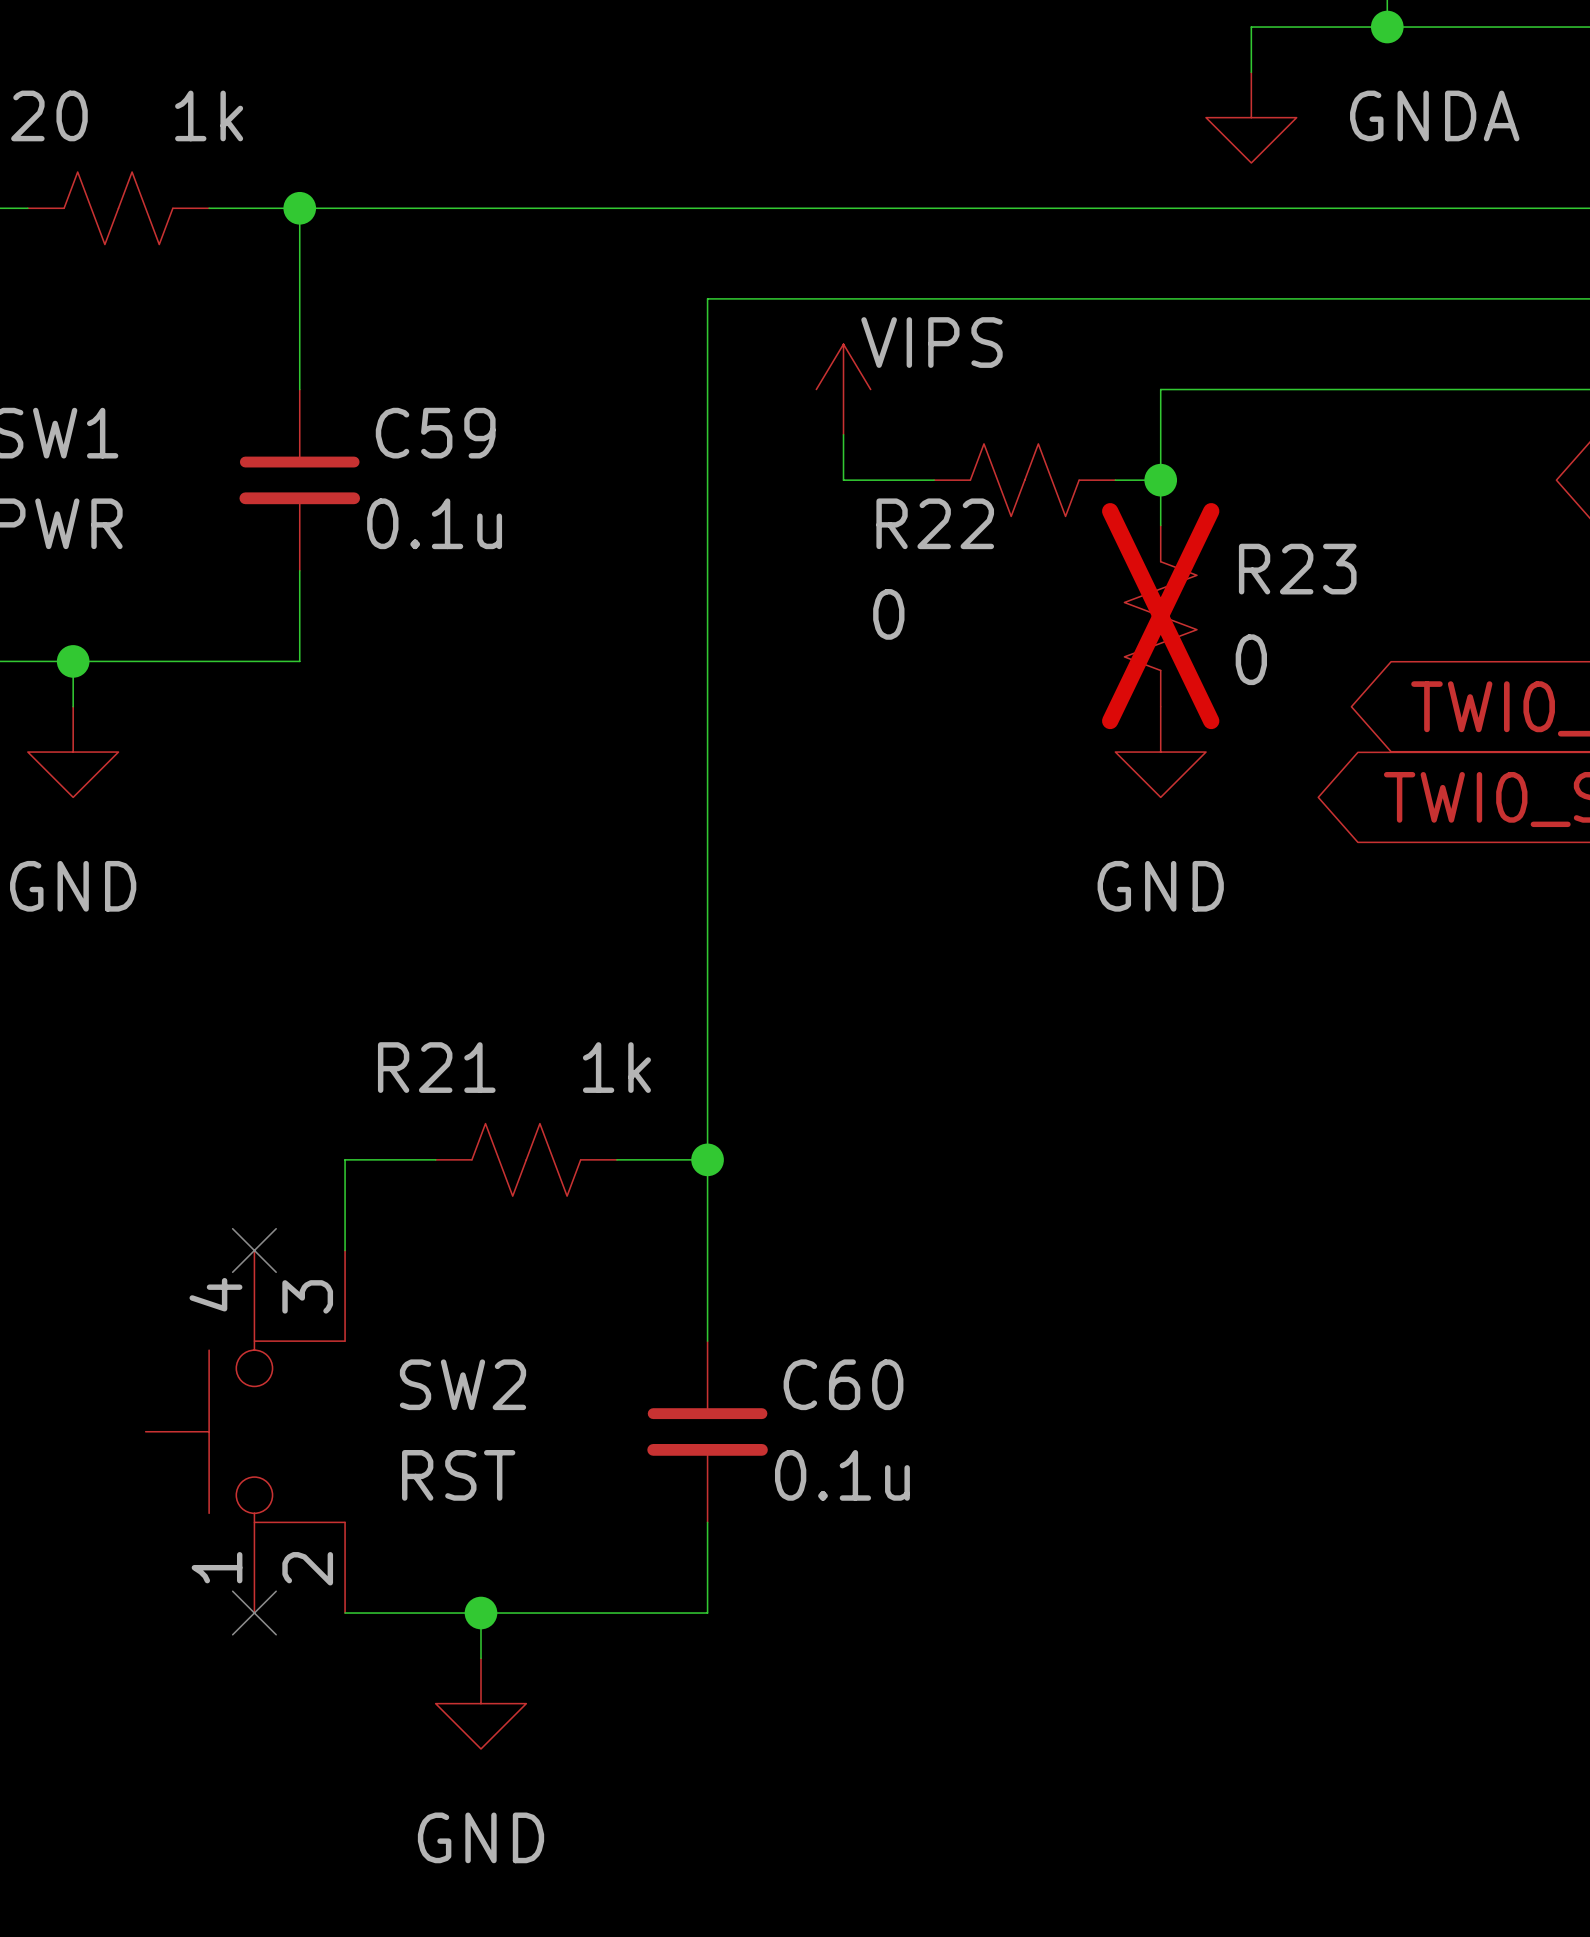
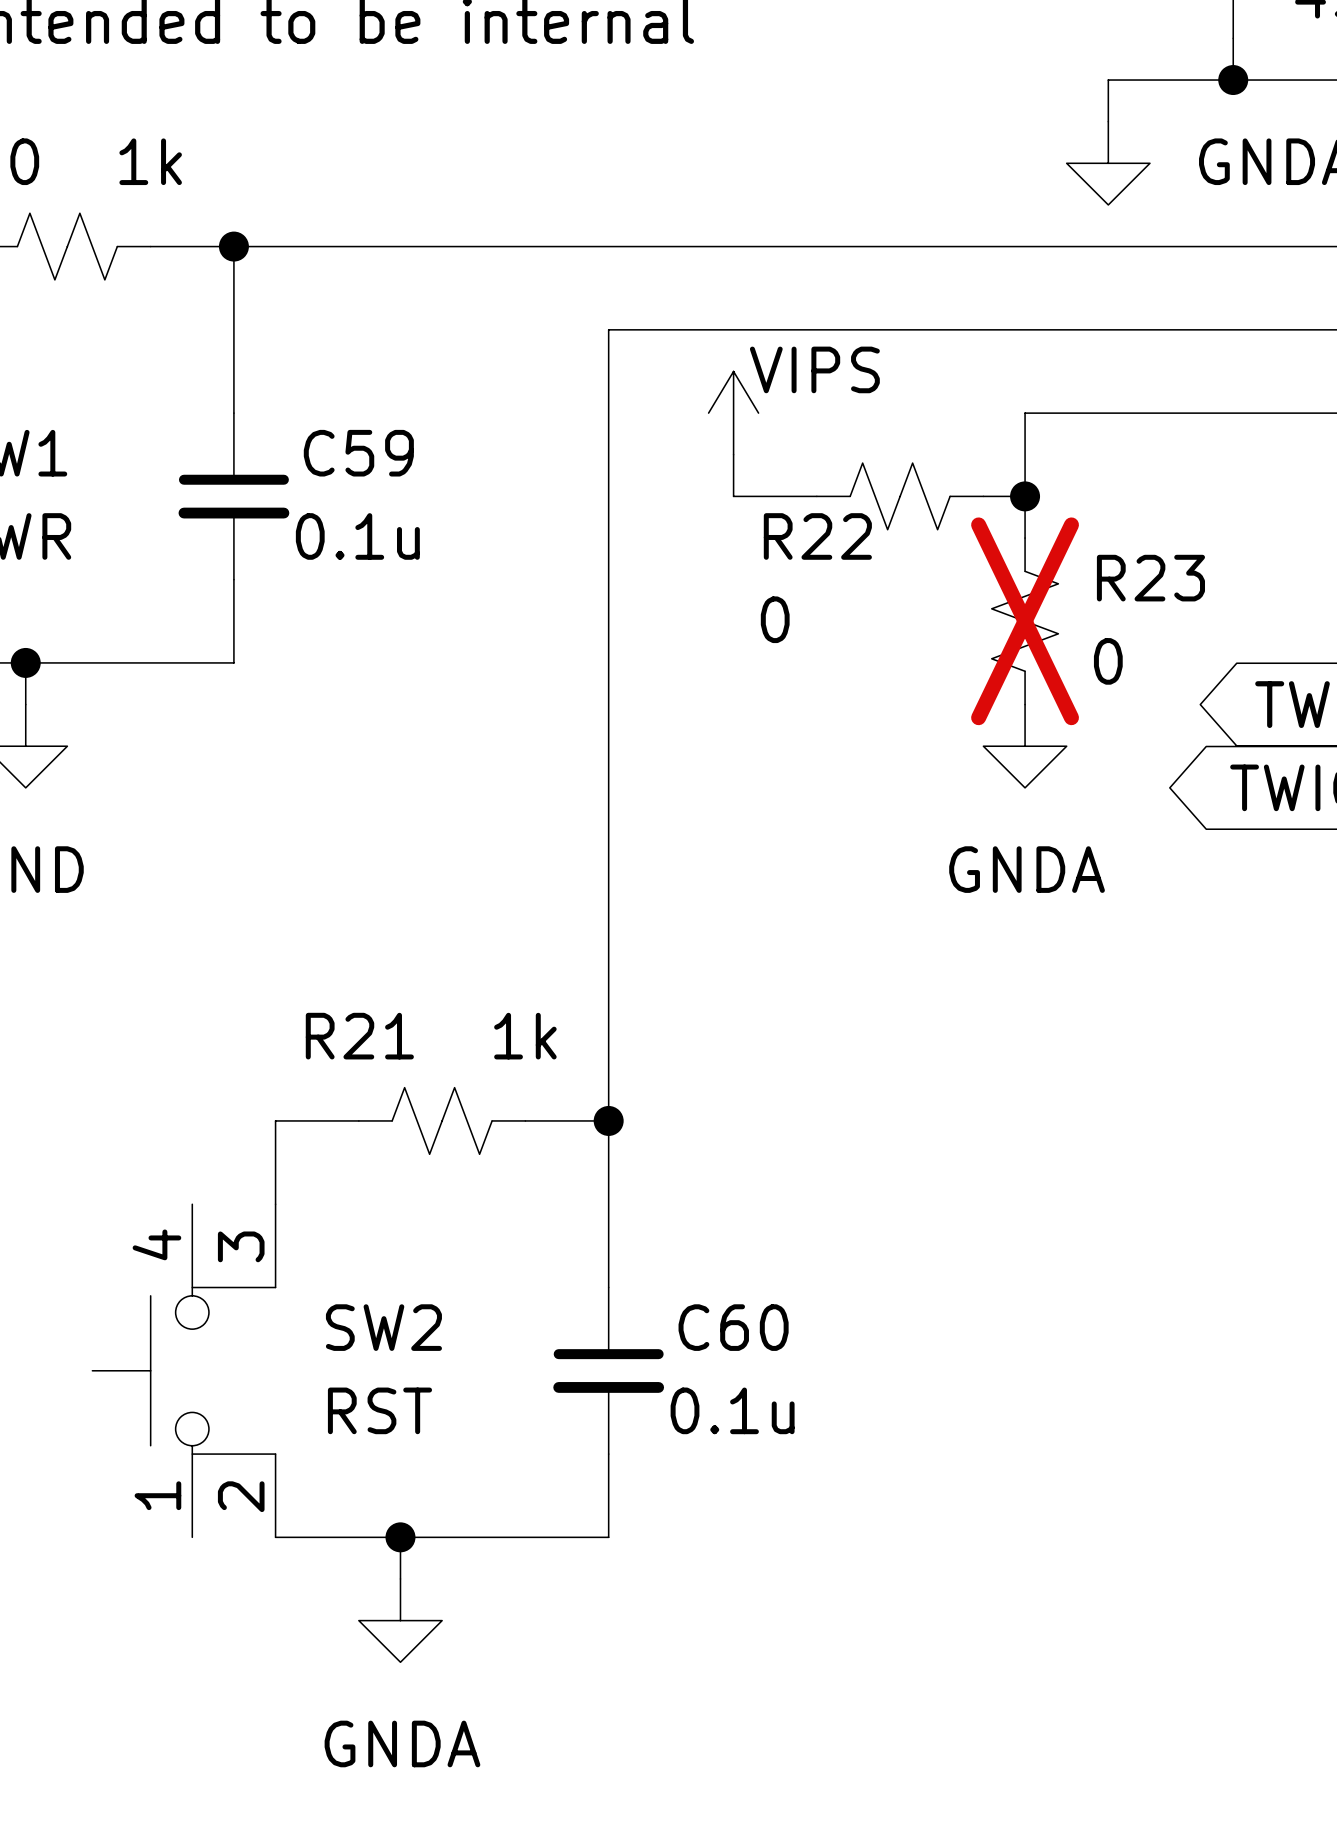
power symbol: GND (1160, 752) -> GNDA (1025, 746)
no-connect mark: (254, 1250) -> none
no-connect mark: (254, 1613) -> none
power symbol: GND (481, 1703) -> GNDA (400, 1620)

